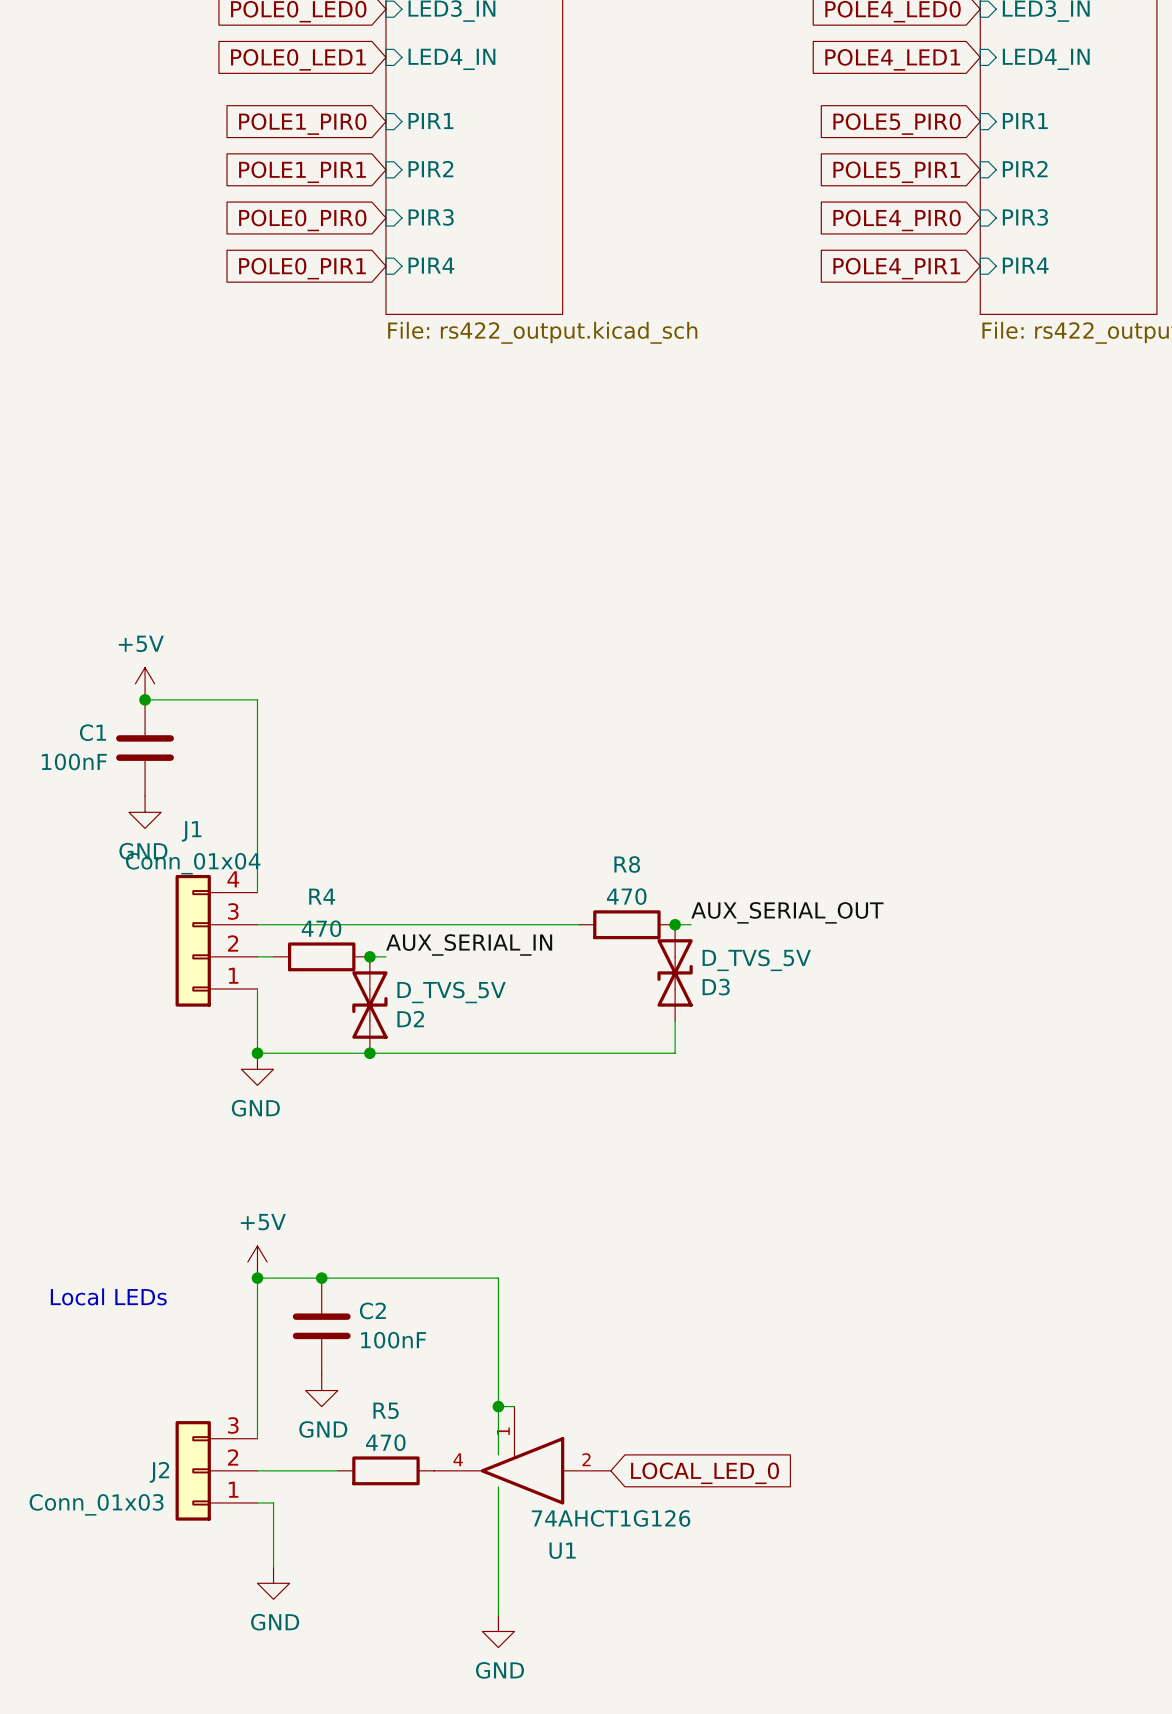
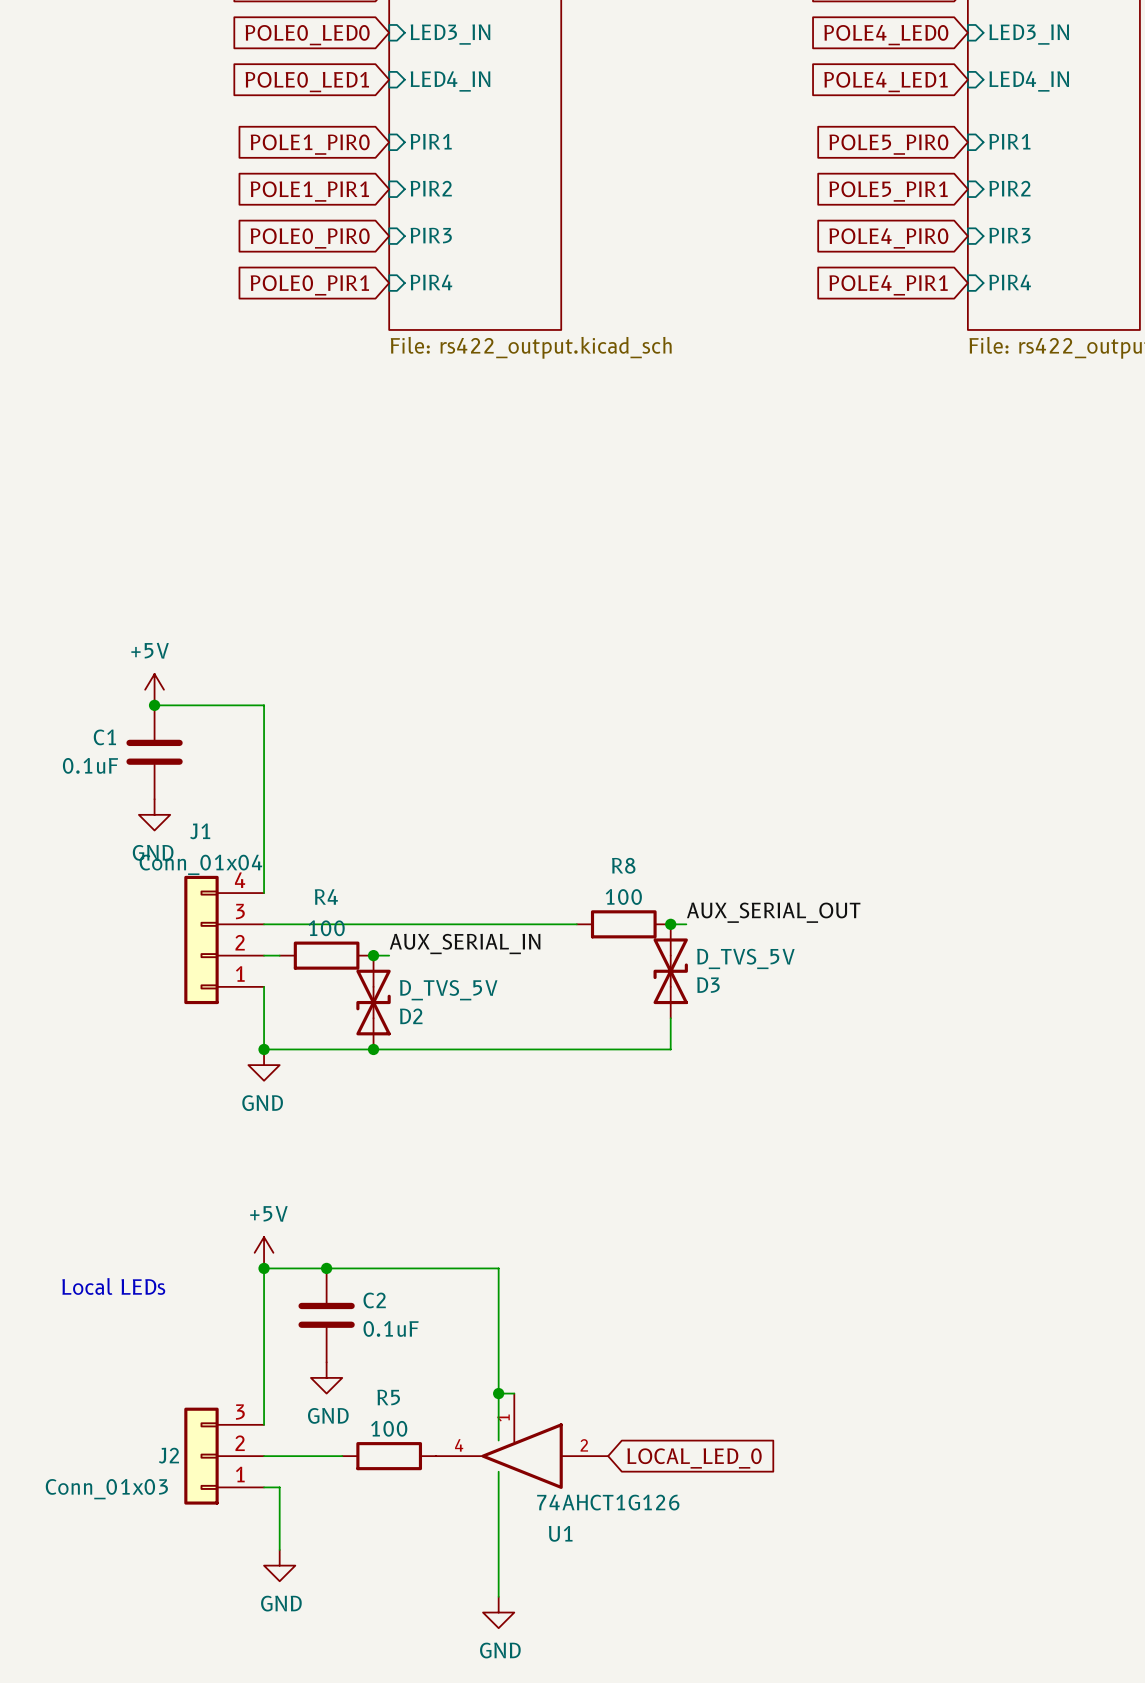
C1 value: 100nF (74, 761) -> 0.1uF (90, 765)
R8 value: 470 (626, 896) -> 100 (623, 897)
R4 value: 470 (321, 928) -> 100 (326, 928)
C2 value: 100nF (393, 1340) -> 0.1uF (391, 1328)
R5 value: 470 (385, 1442) -> 100 (389, 1428)

